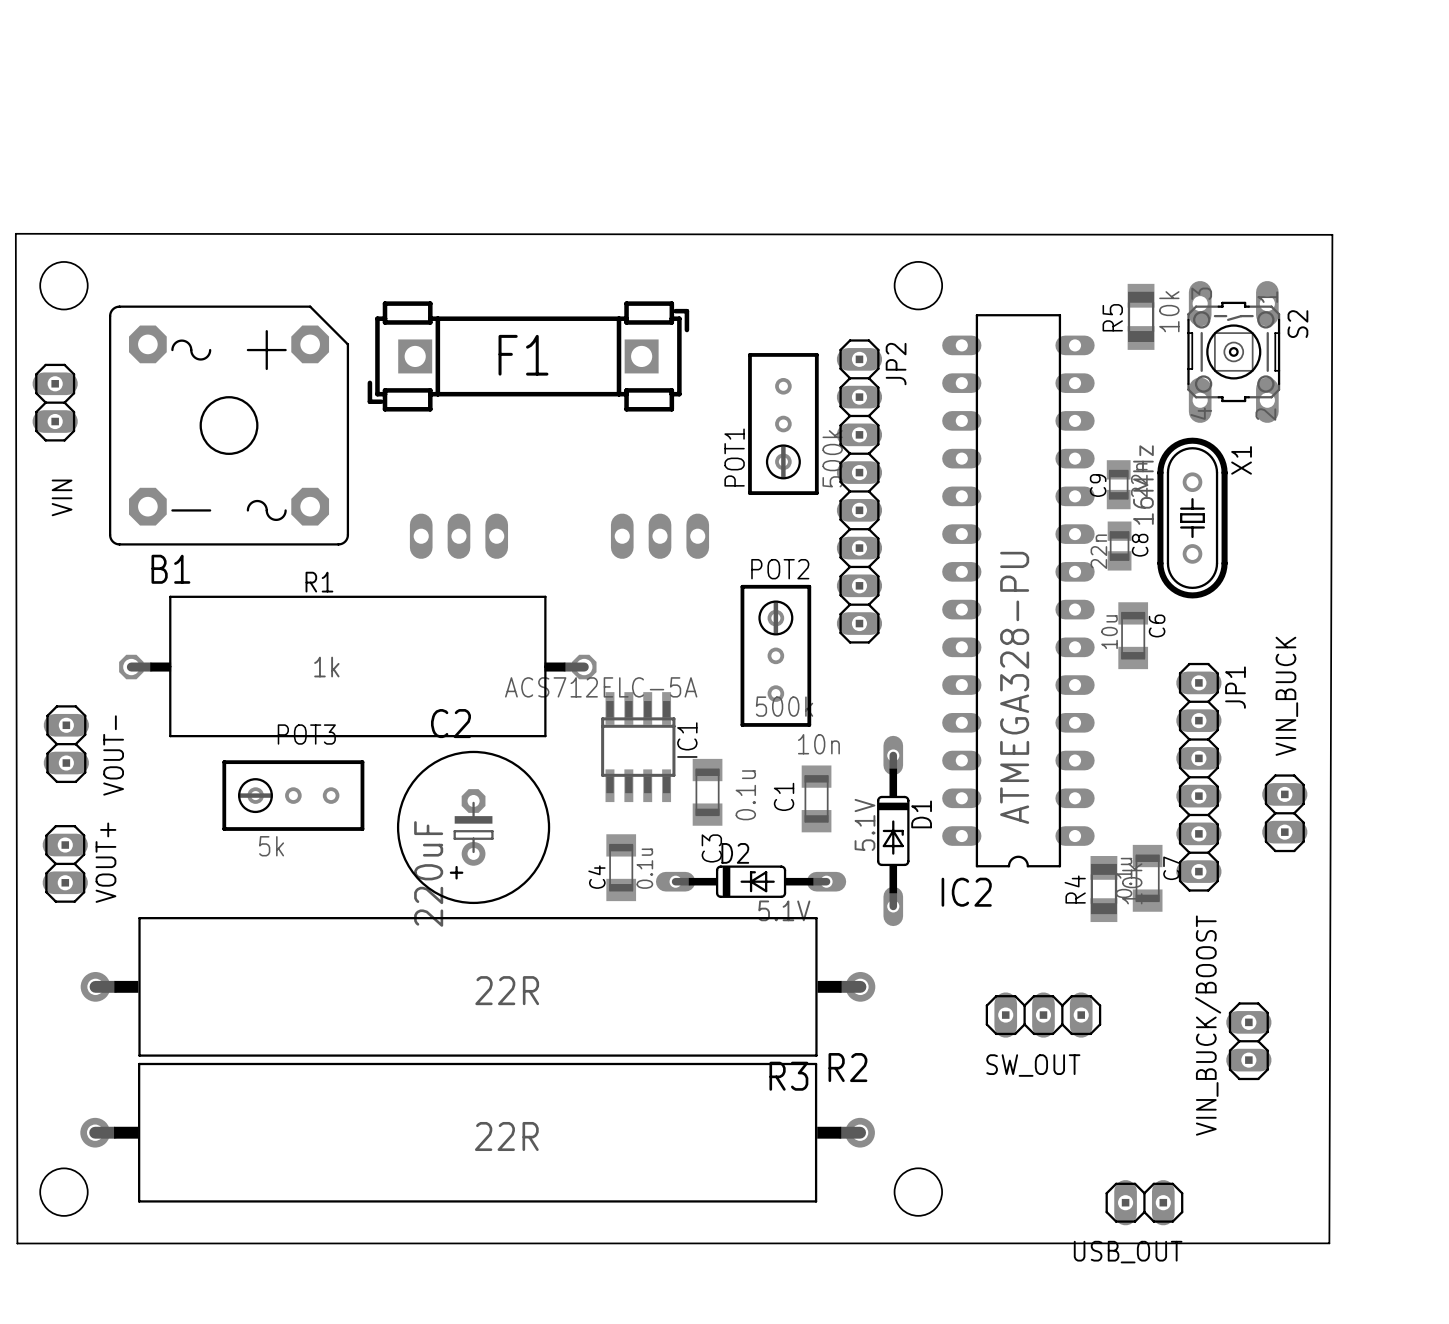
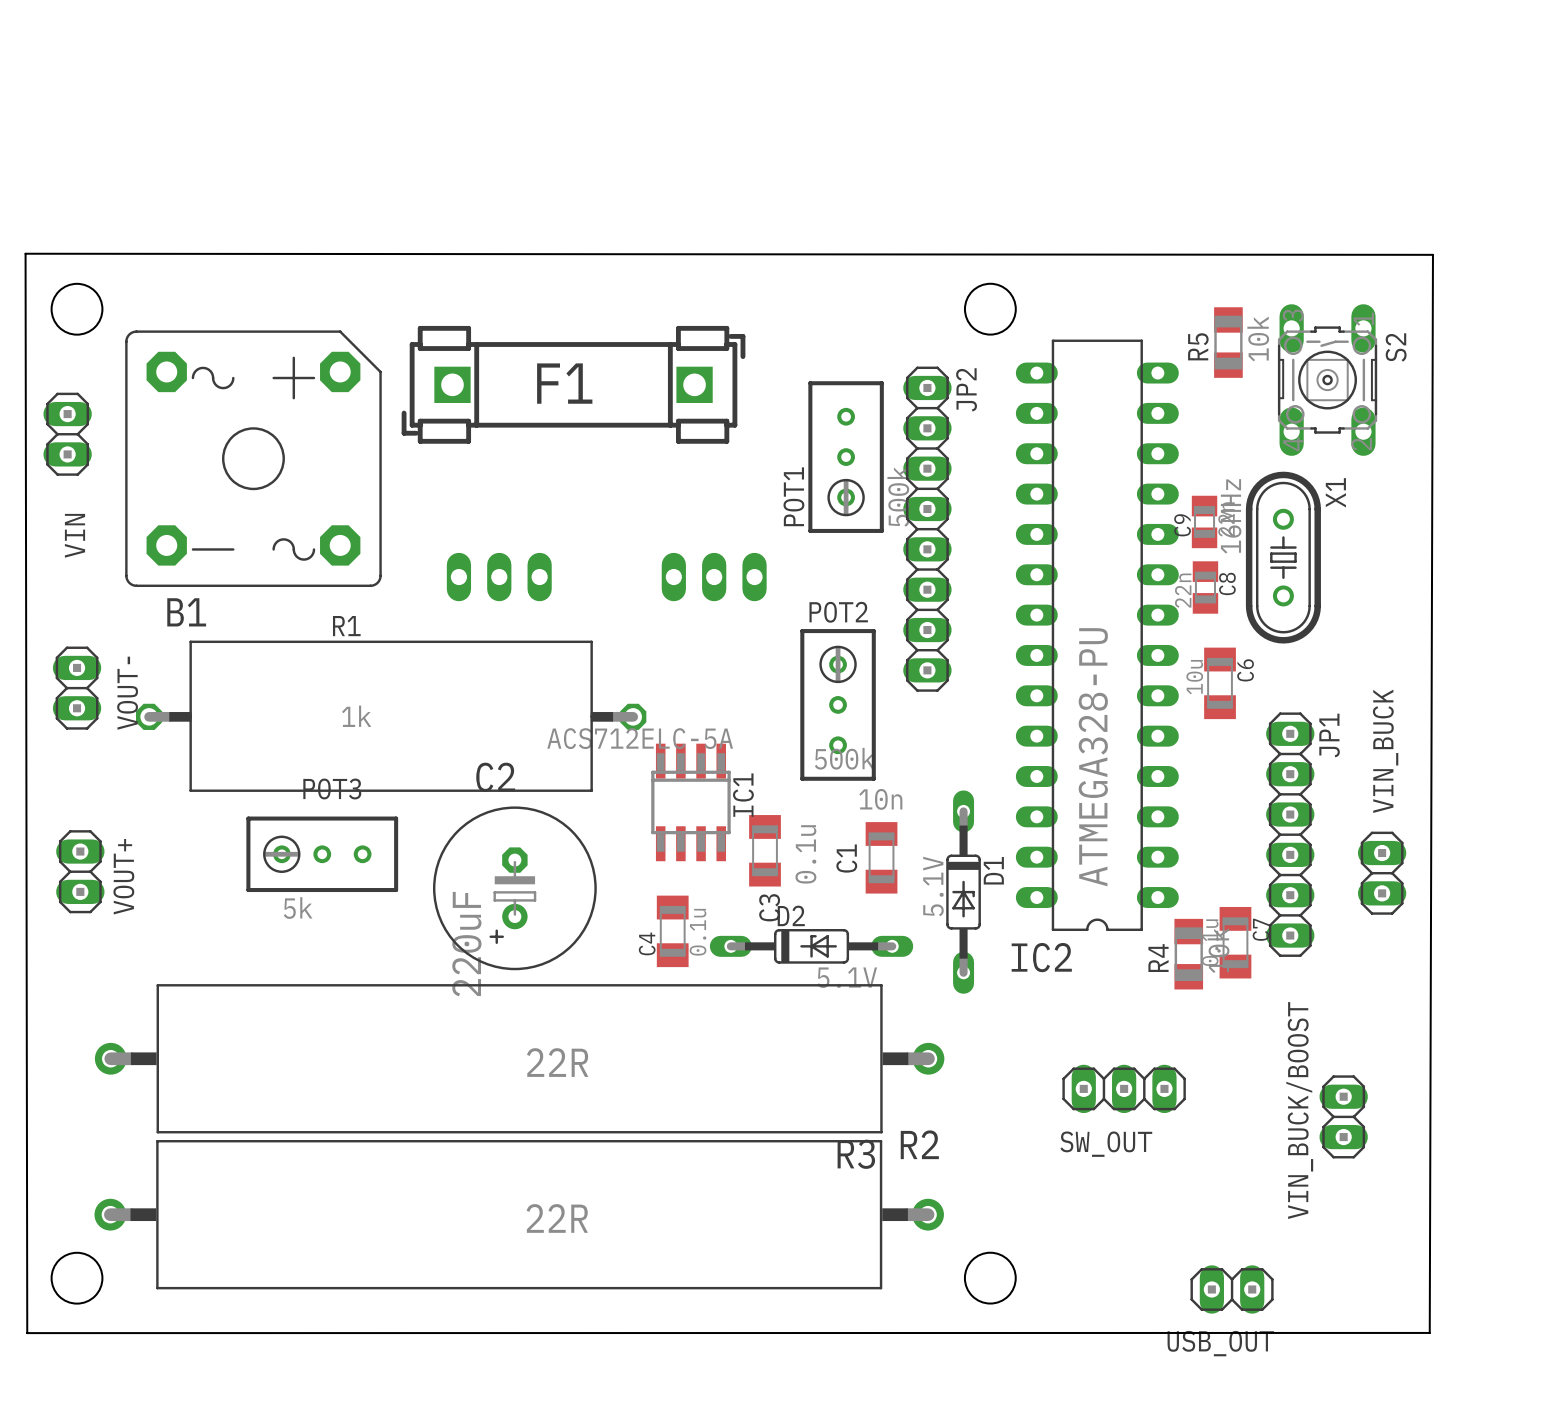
VOUT- position: (66, 744) -> (77, 688)
VOUT+ position: (65, 863) -> (80, 871)

